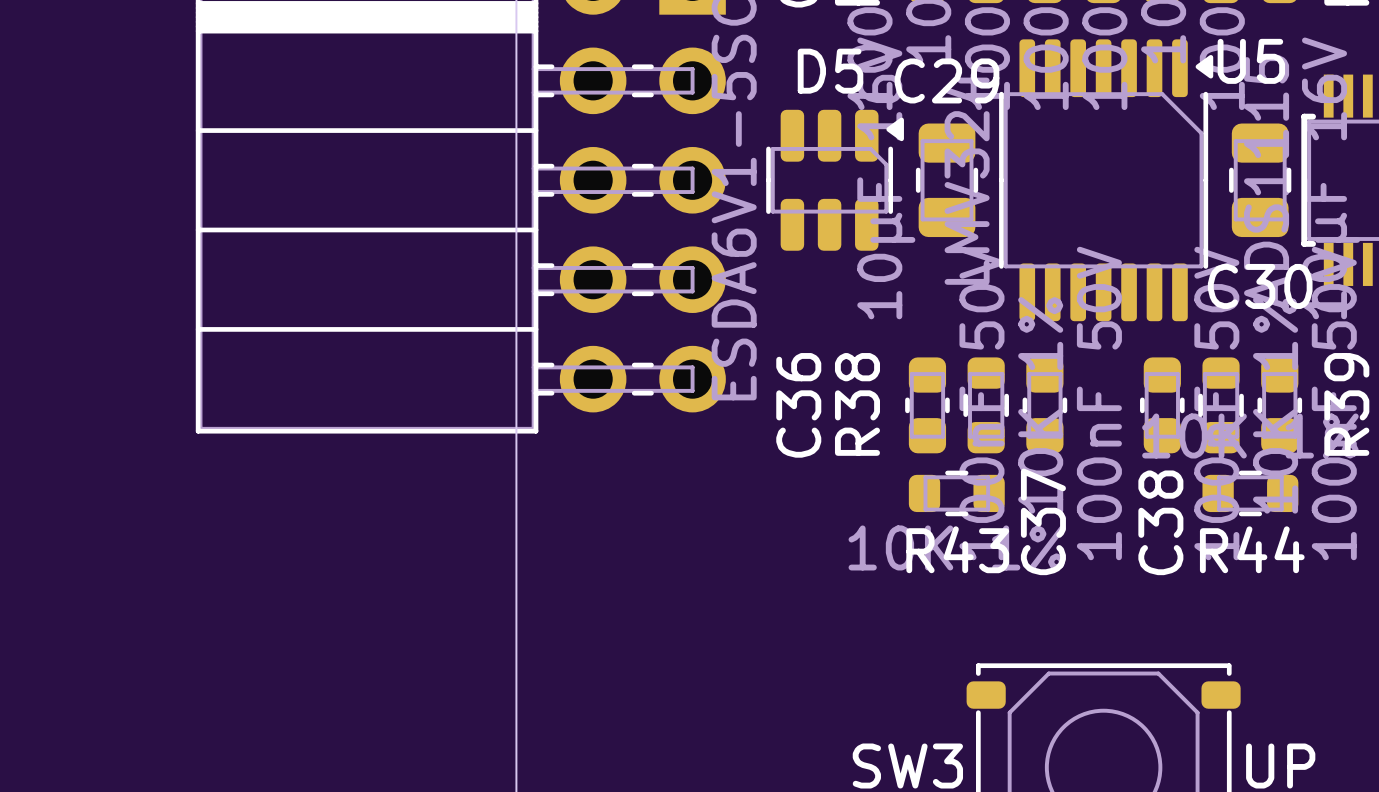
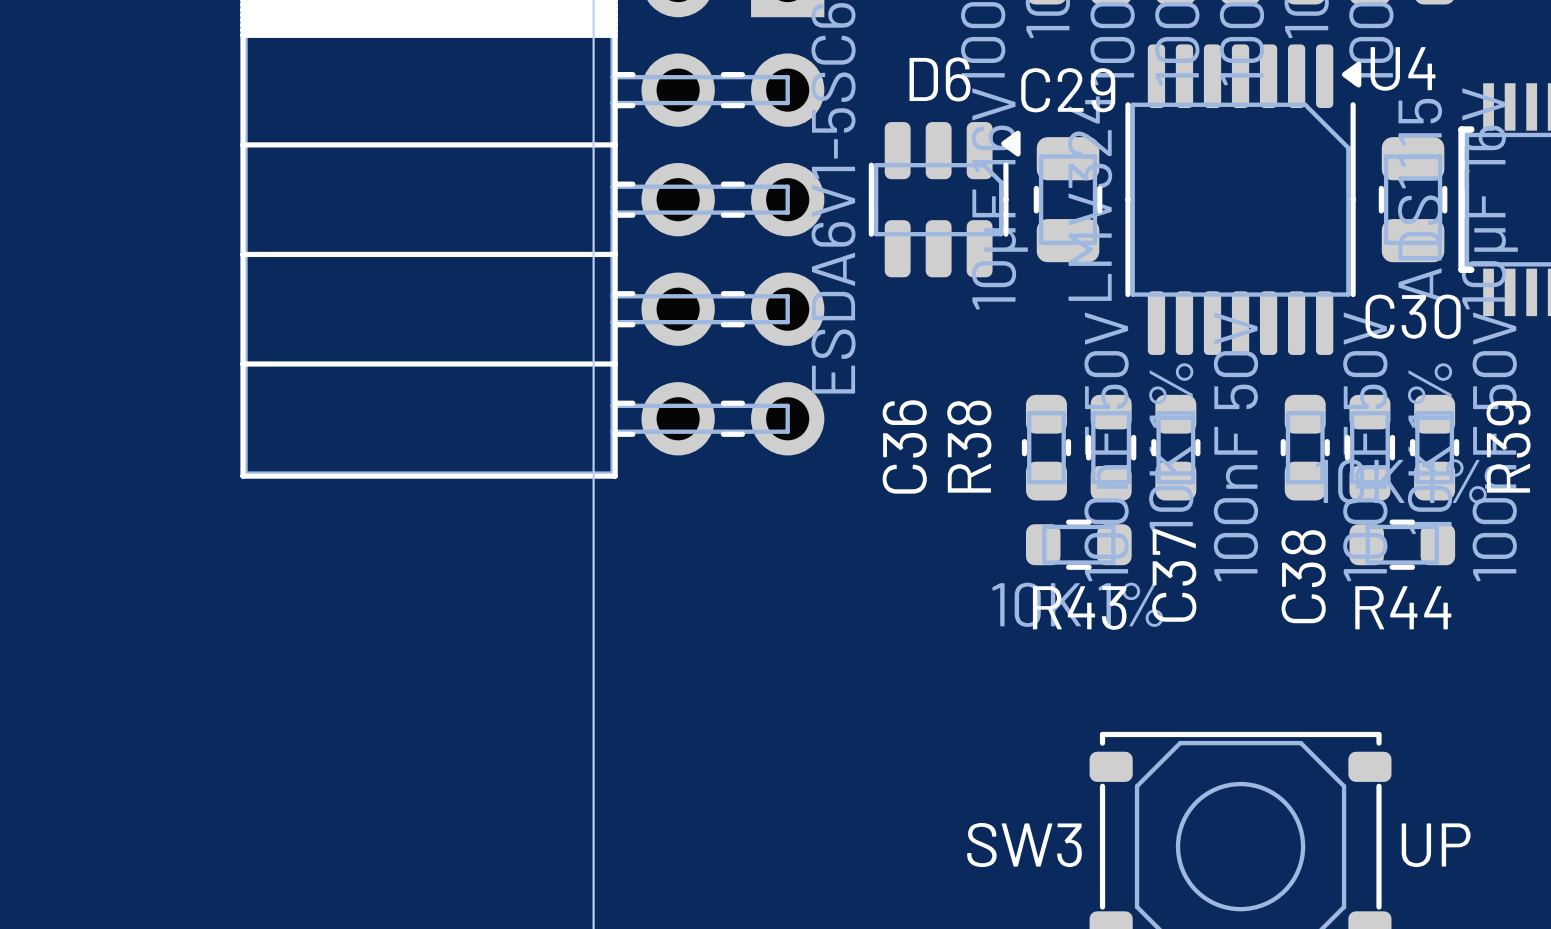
U5 name: U5 (1251, 61) -> U4 (1403, 68)
D5 name: D5 (830, 71) -> D6 (940, 79)

